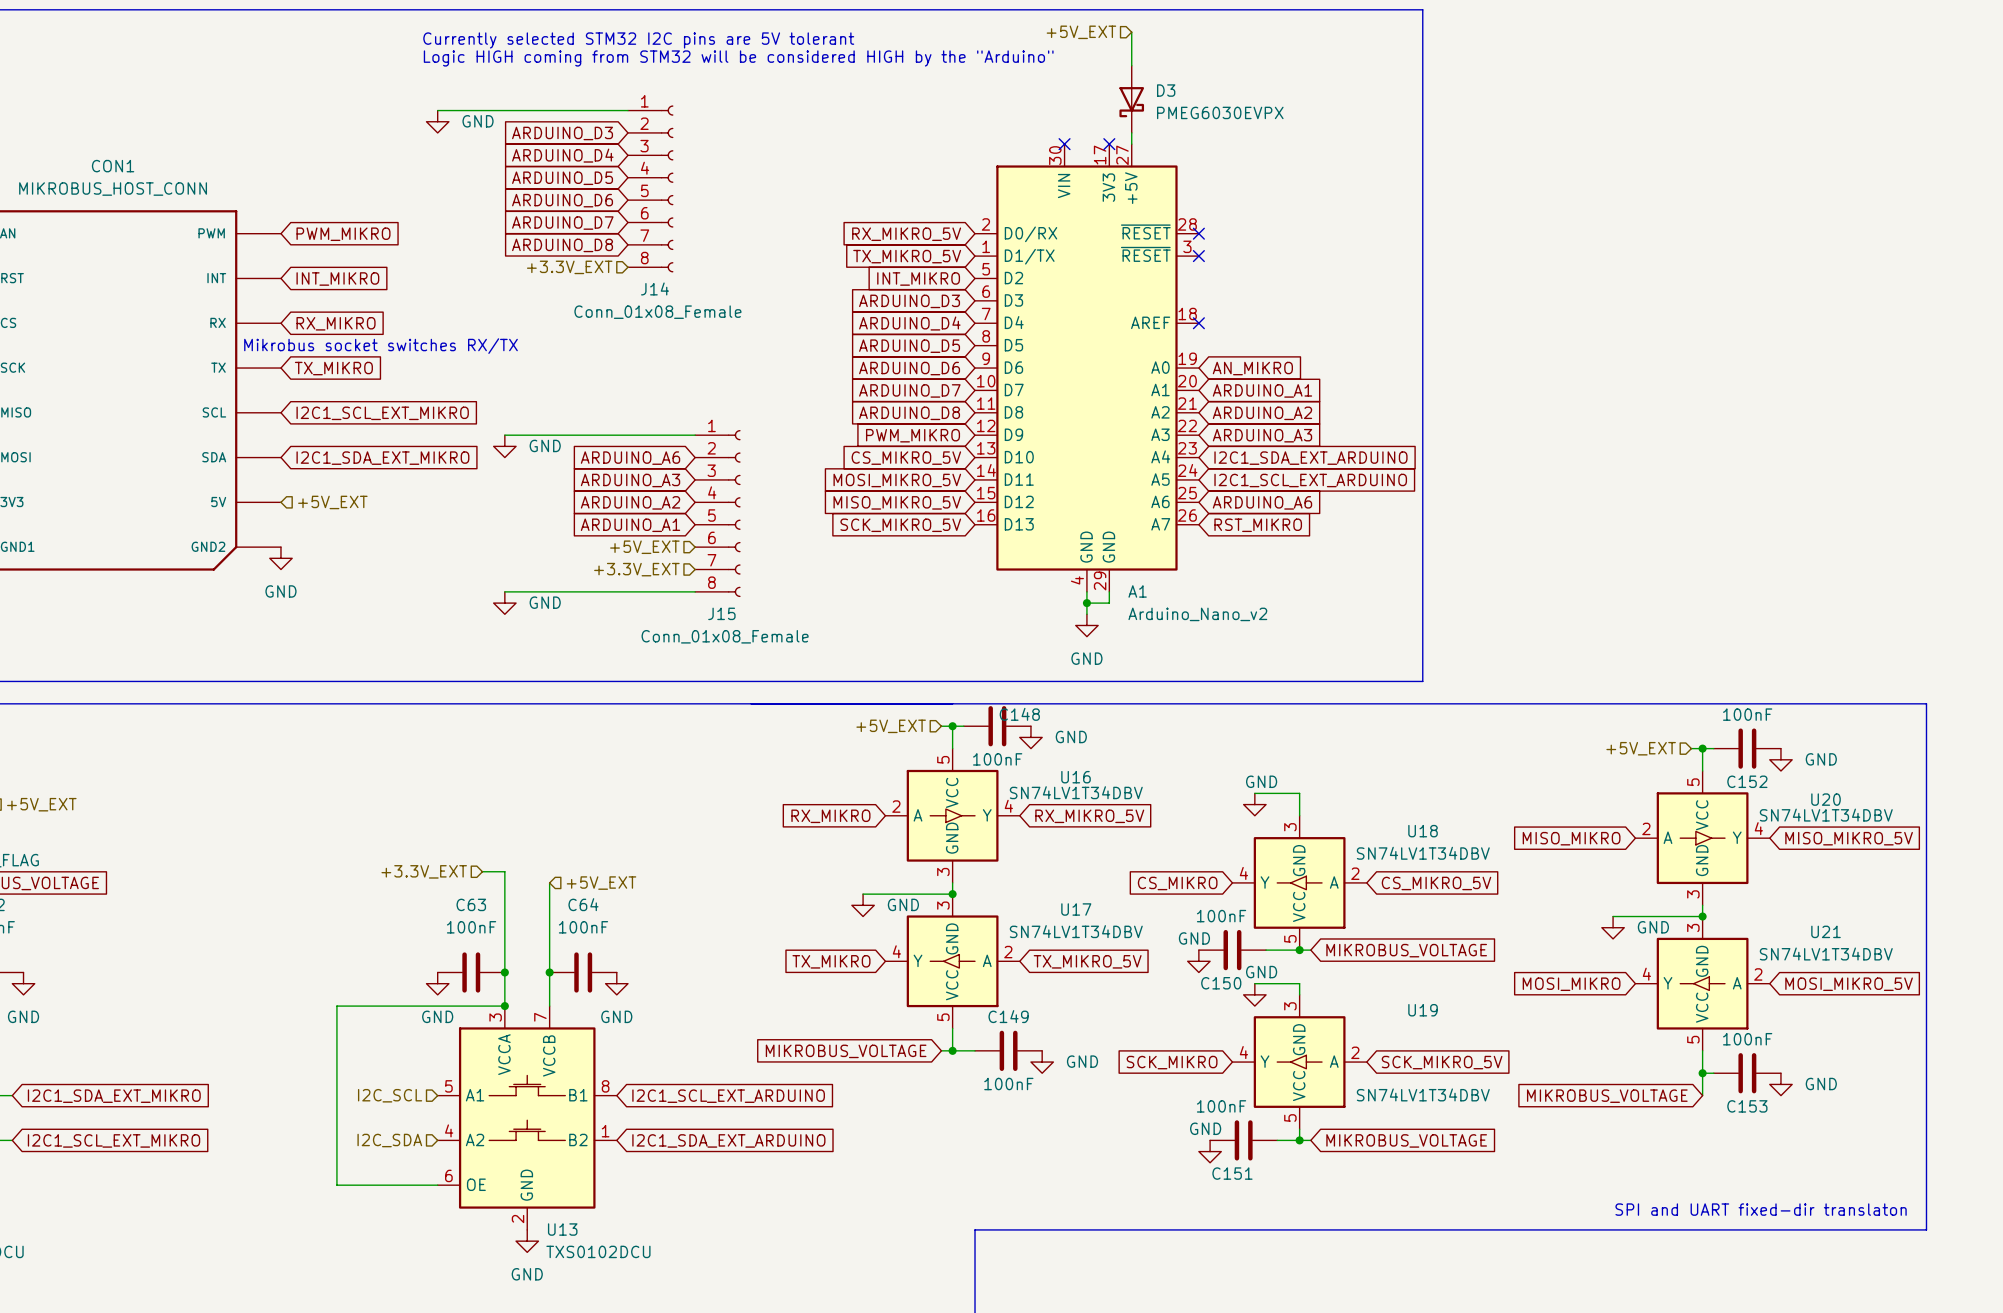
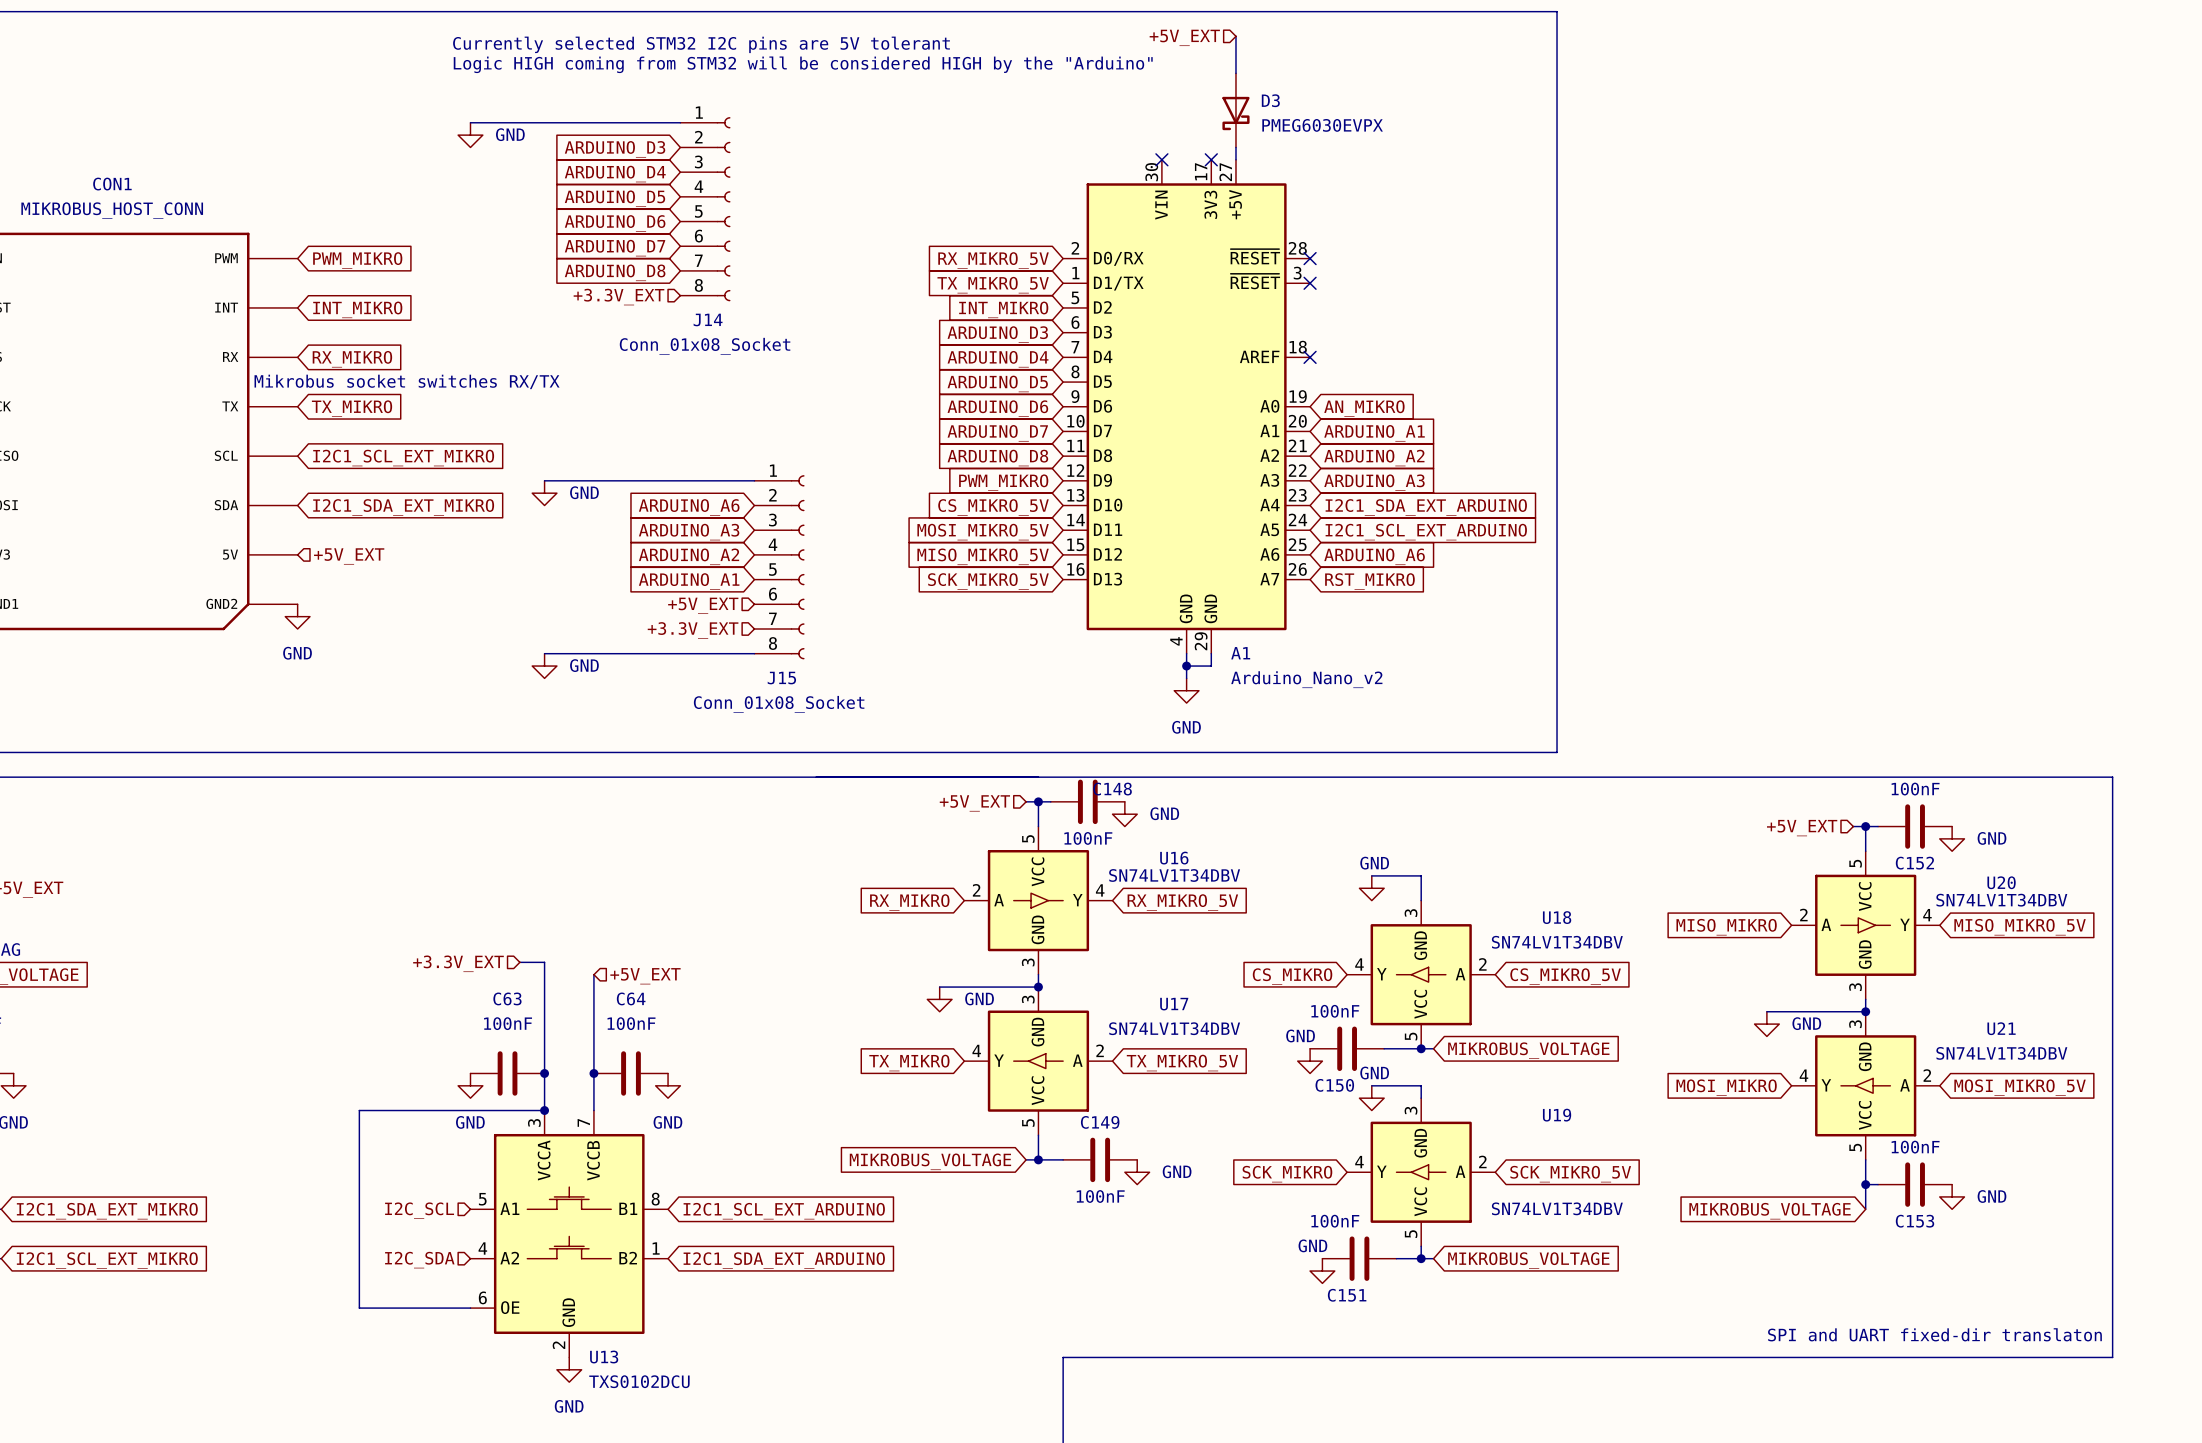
J14 value: Conn_01x08_Female (657, 312) -> Conn_01x08_Socket (705, 346)
J15 value: Conn_01x08_Female (725, 636) -> Conn_01x08_Socket (779, 704)

